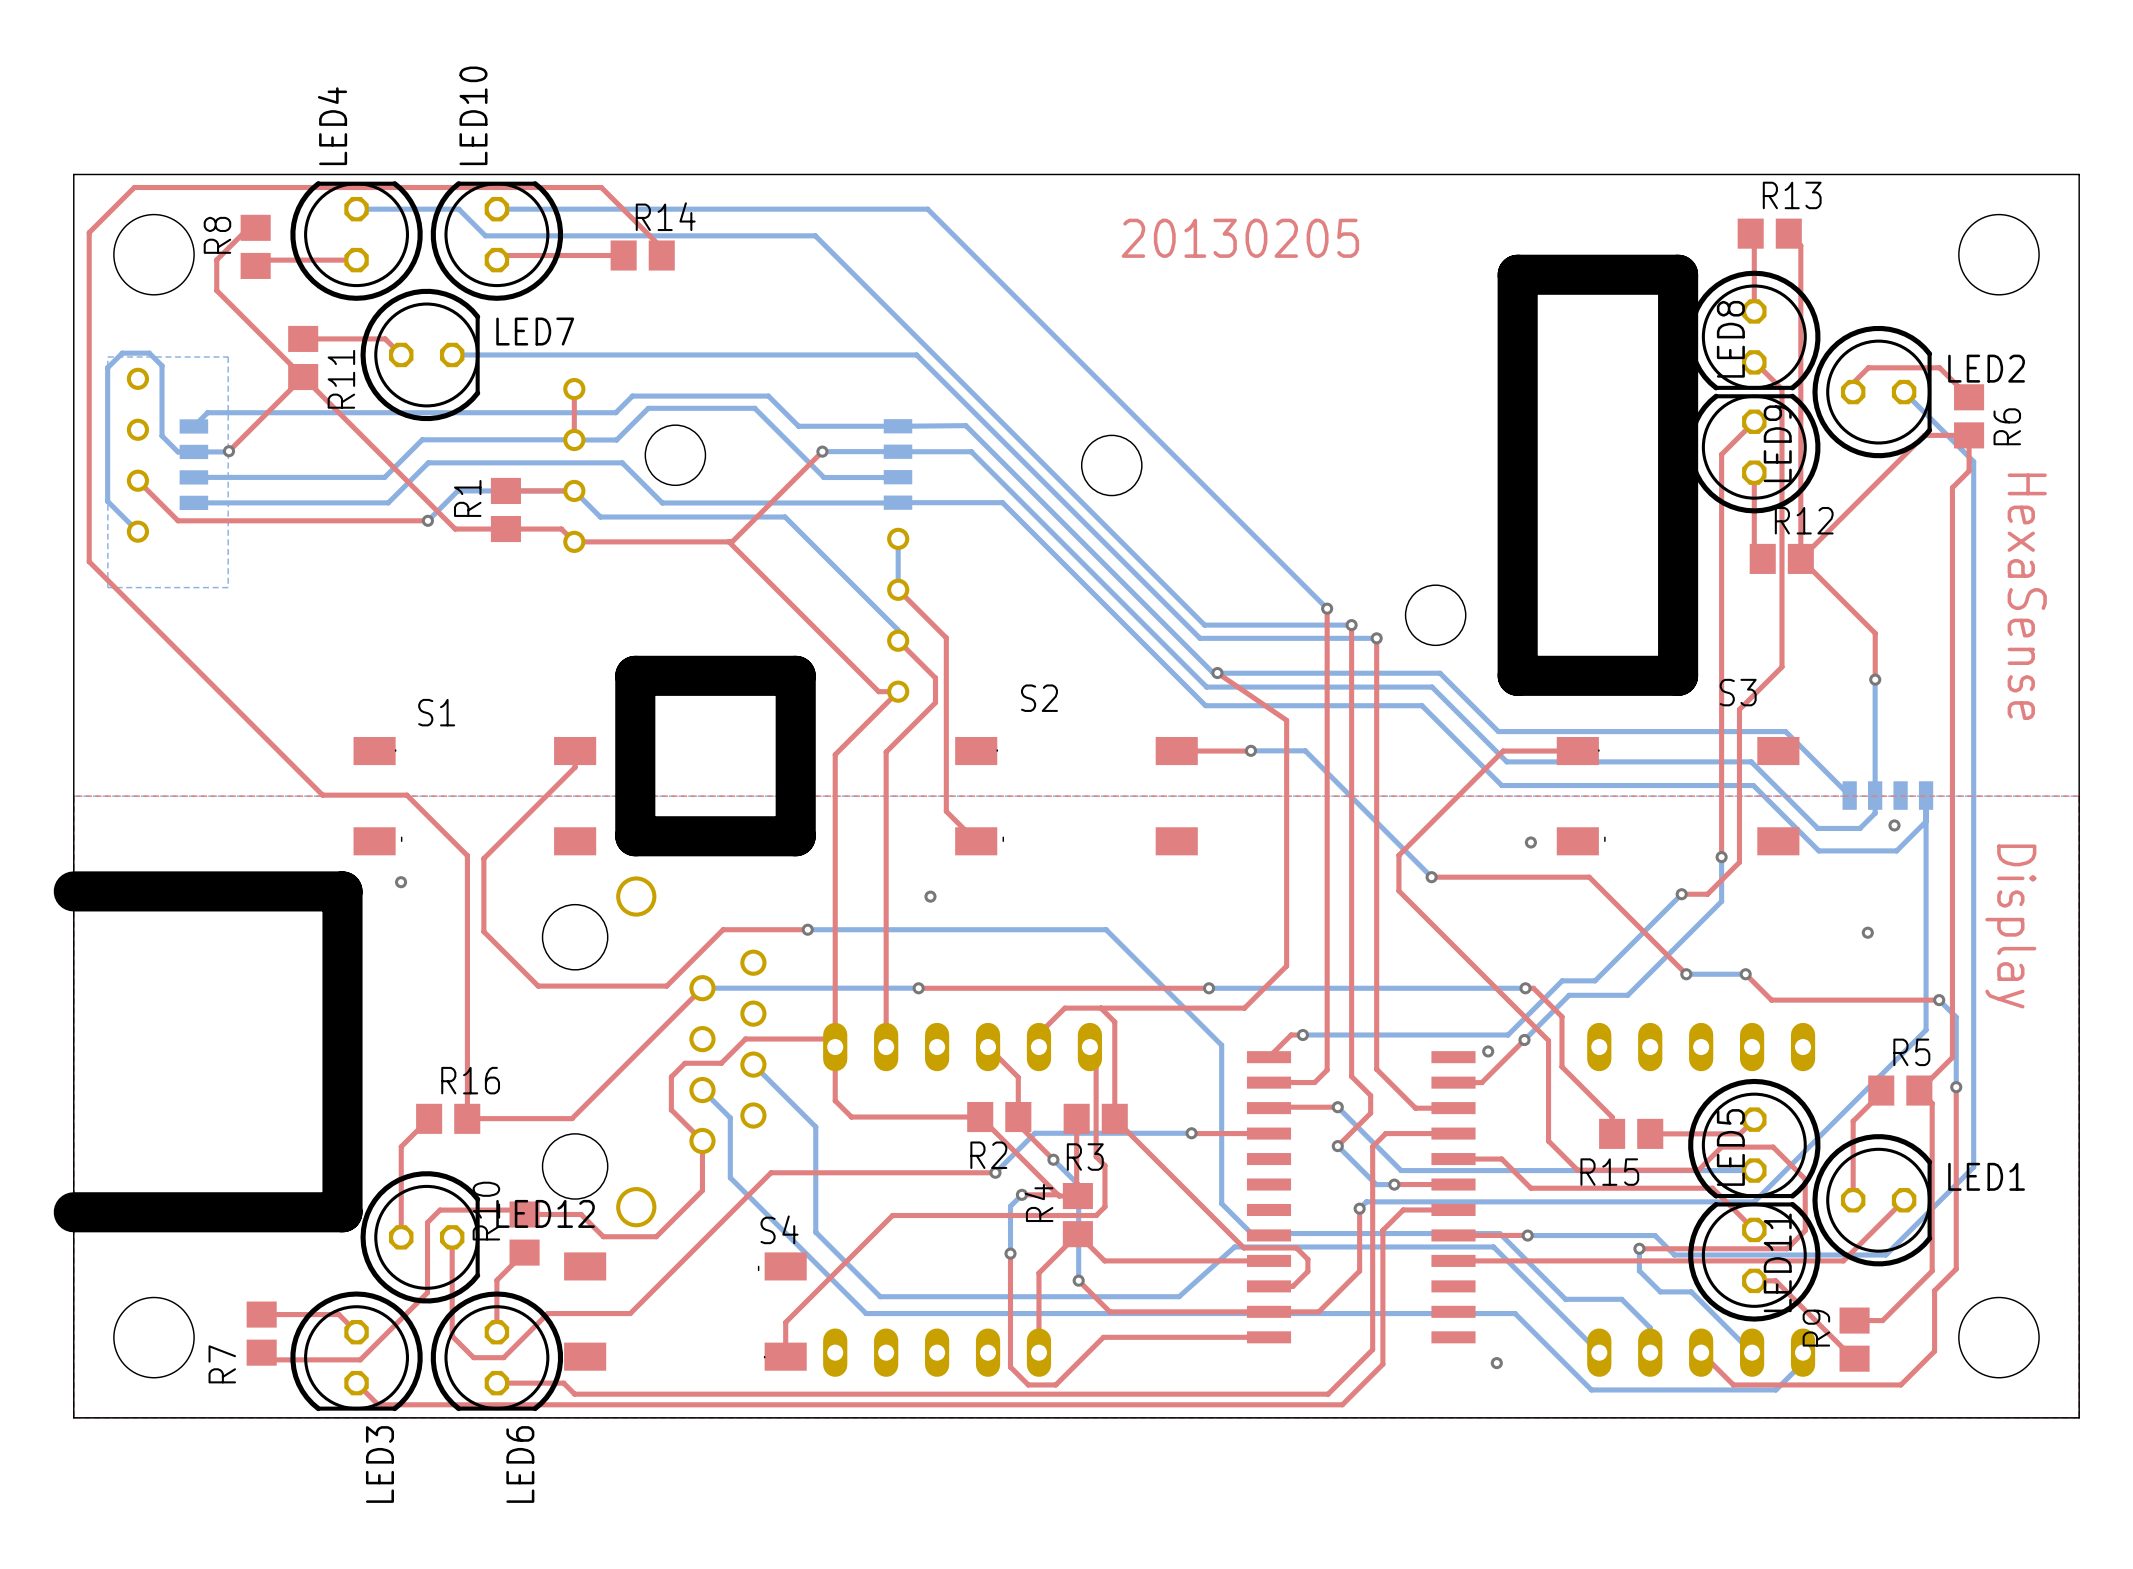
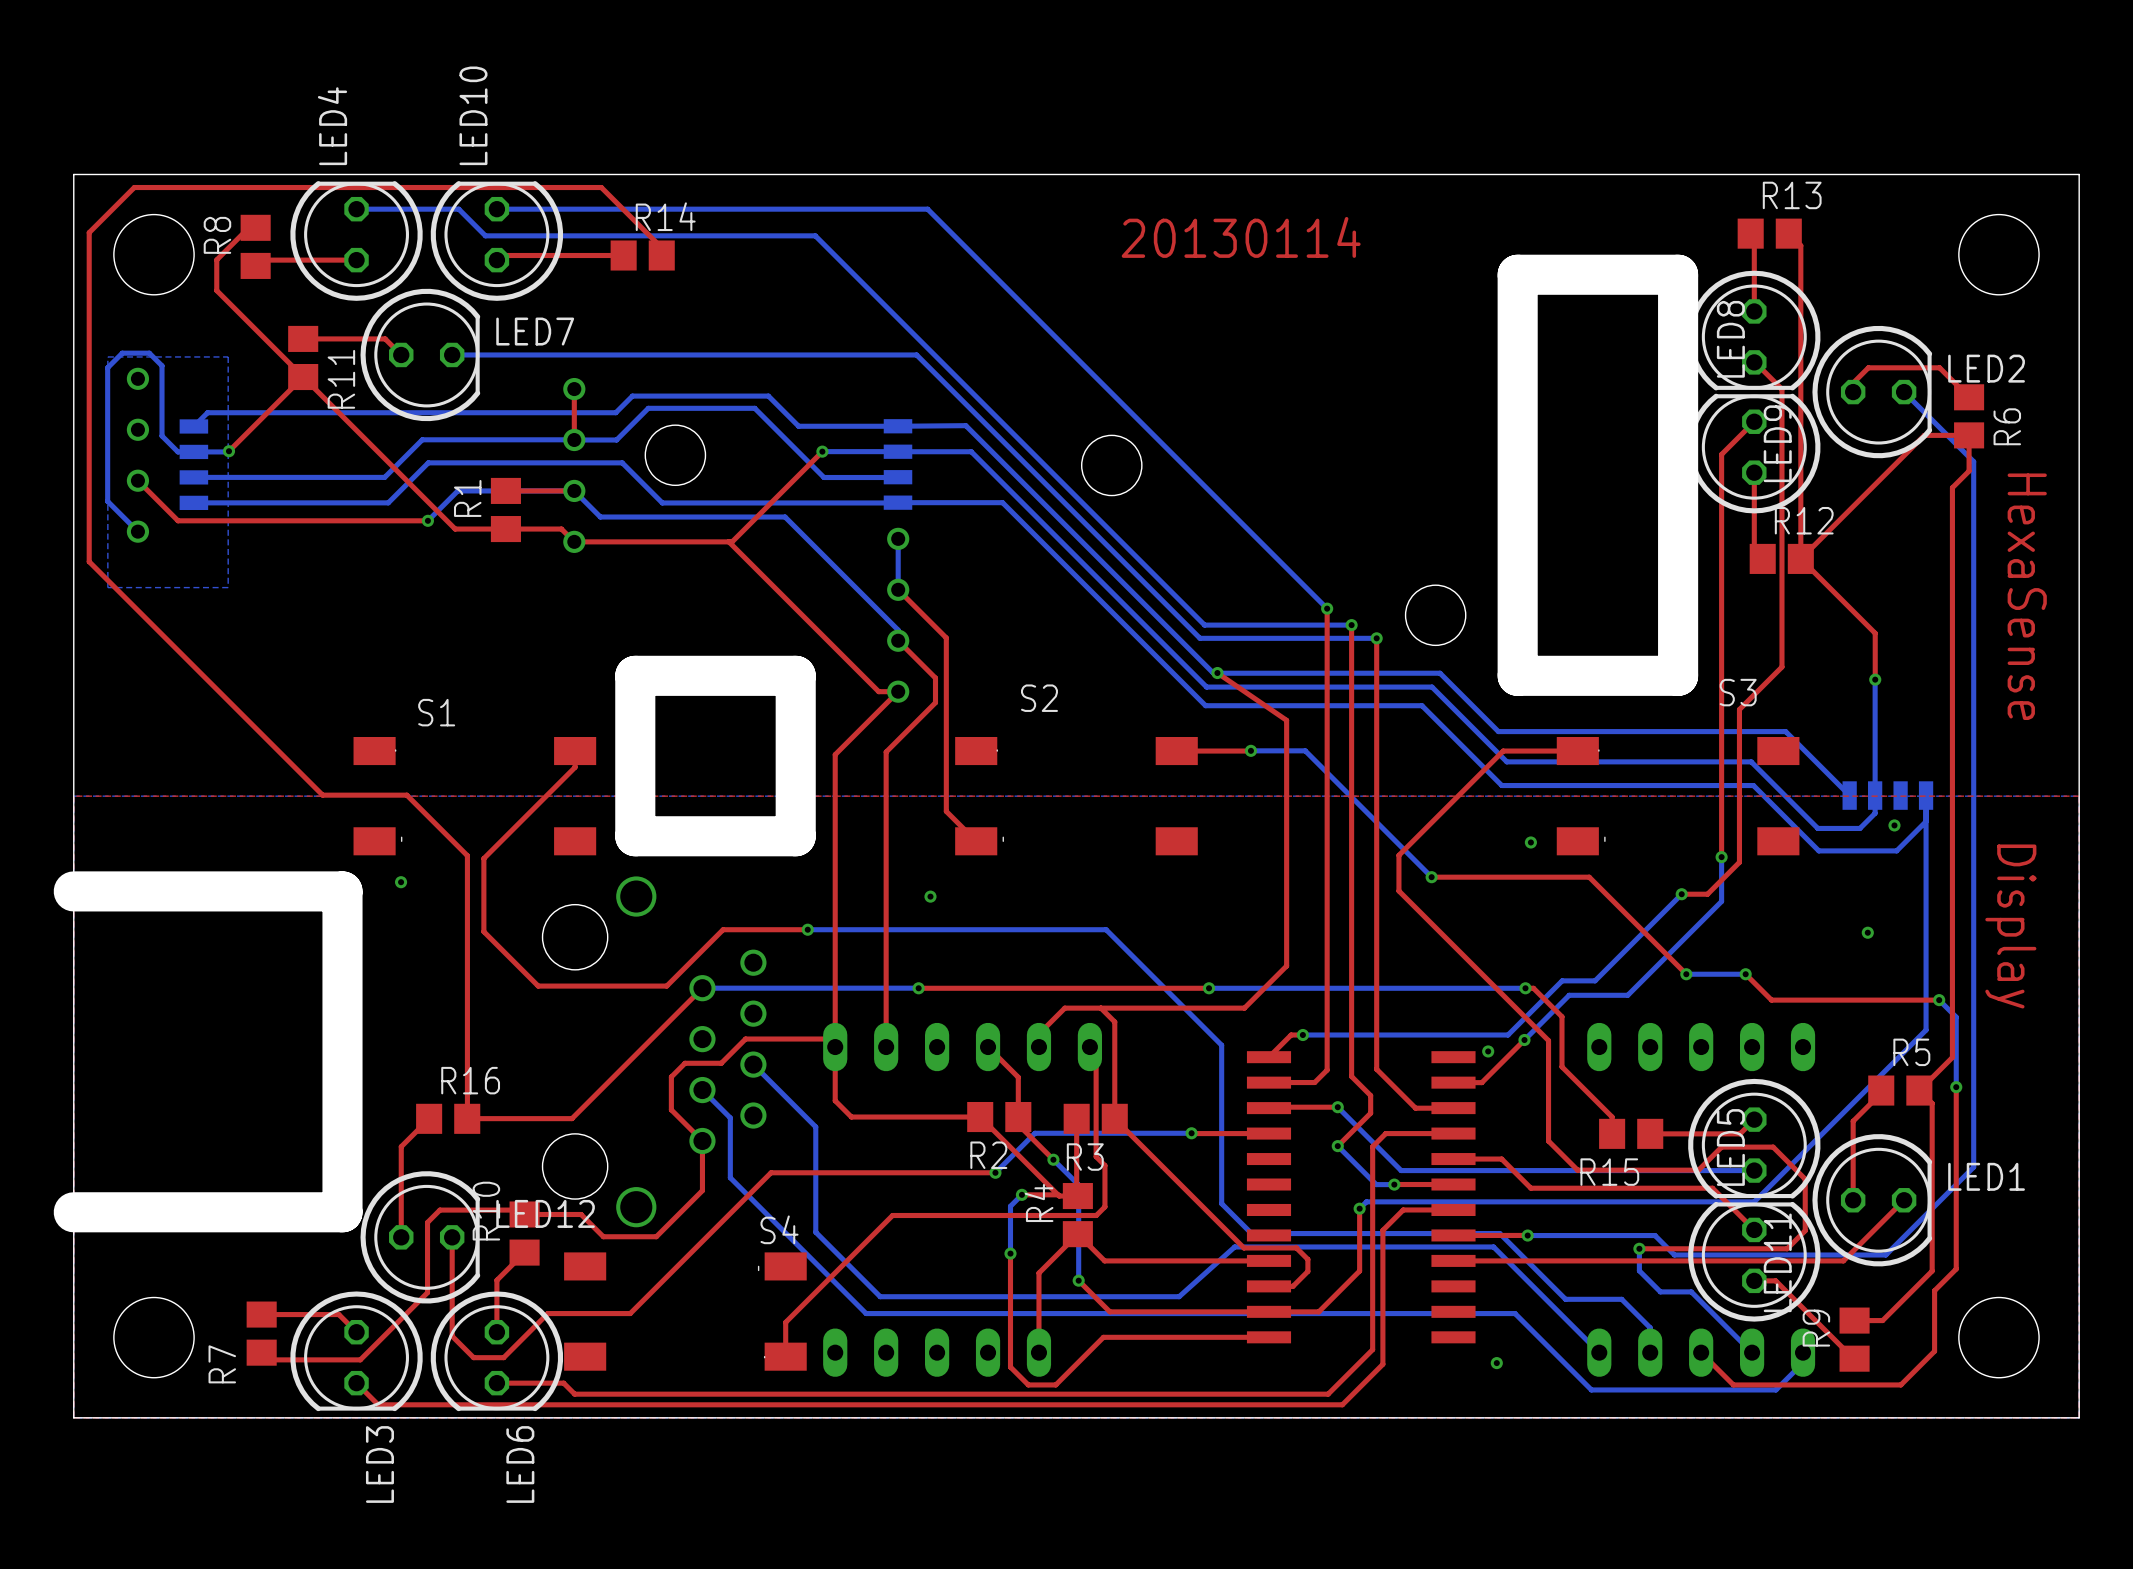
text: 20130205 (1240, 238) -> 20130114 (1241, 237)

